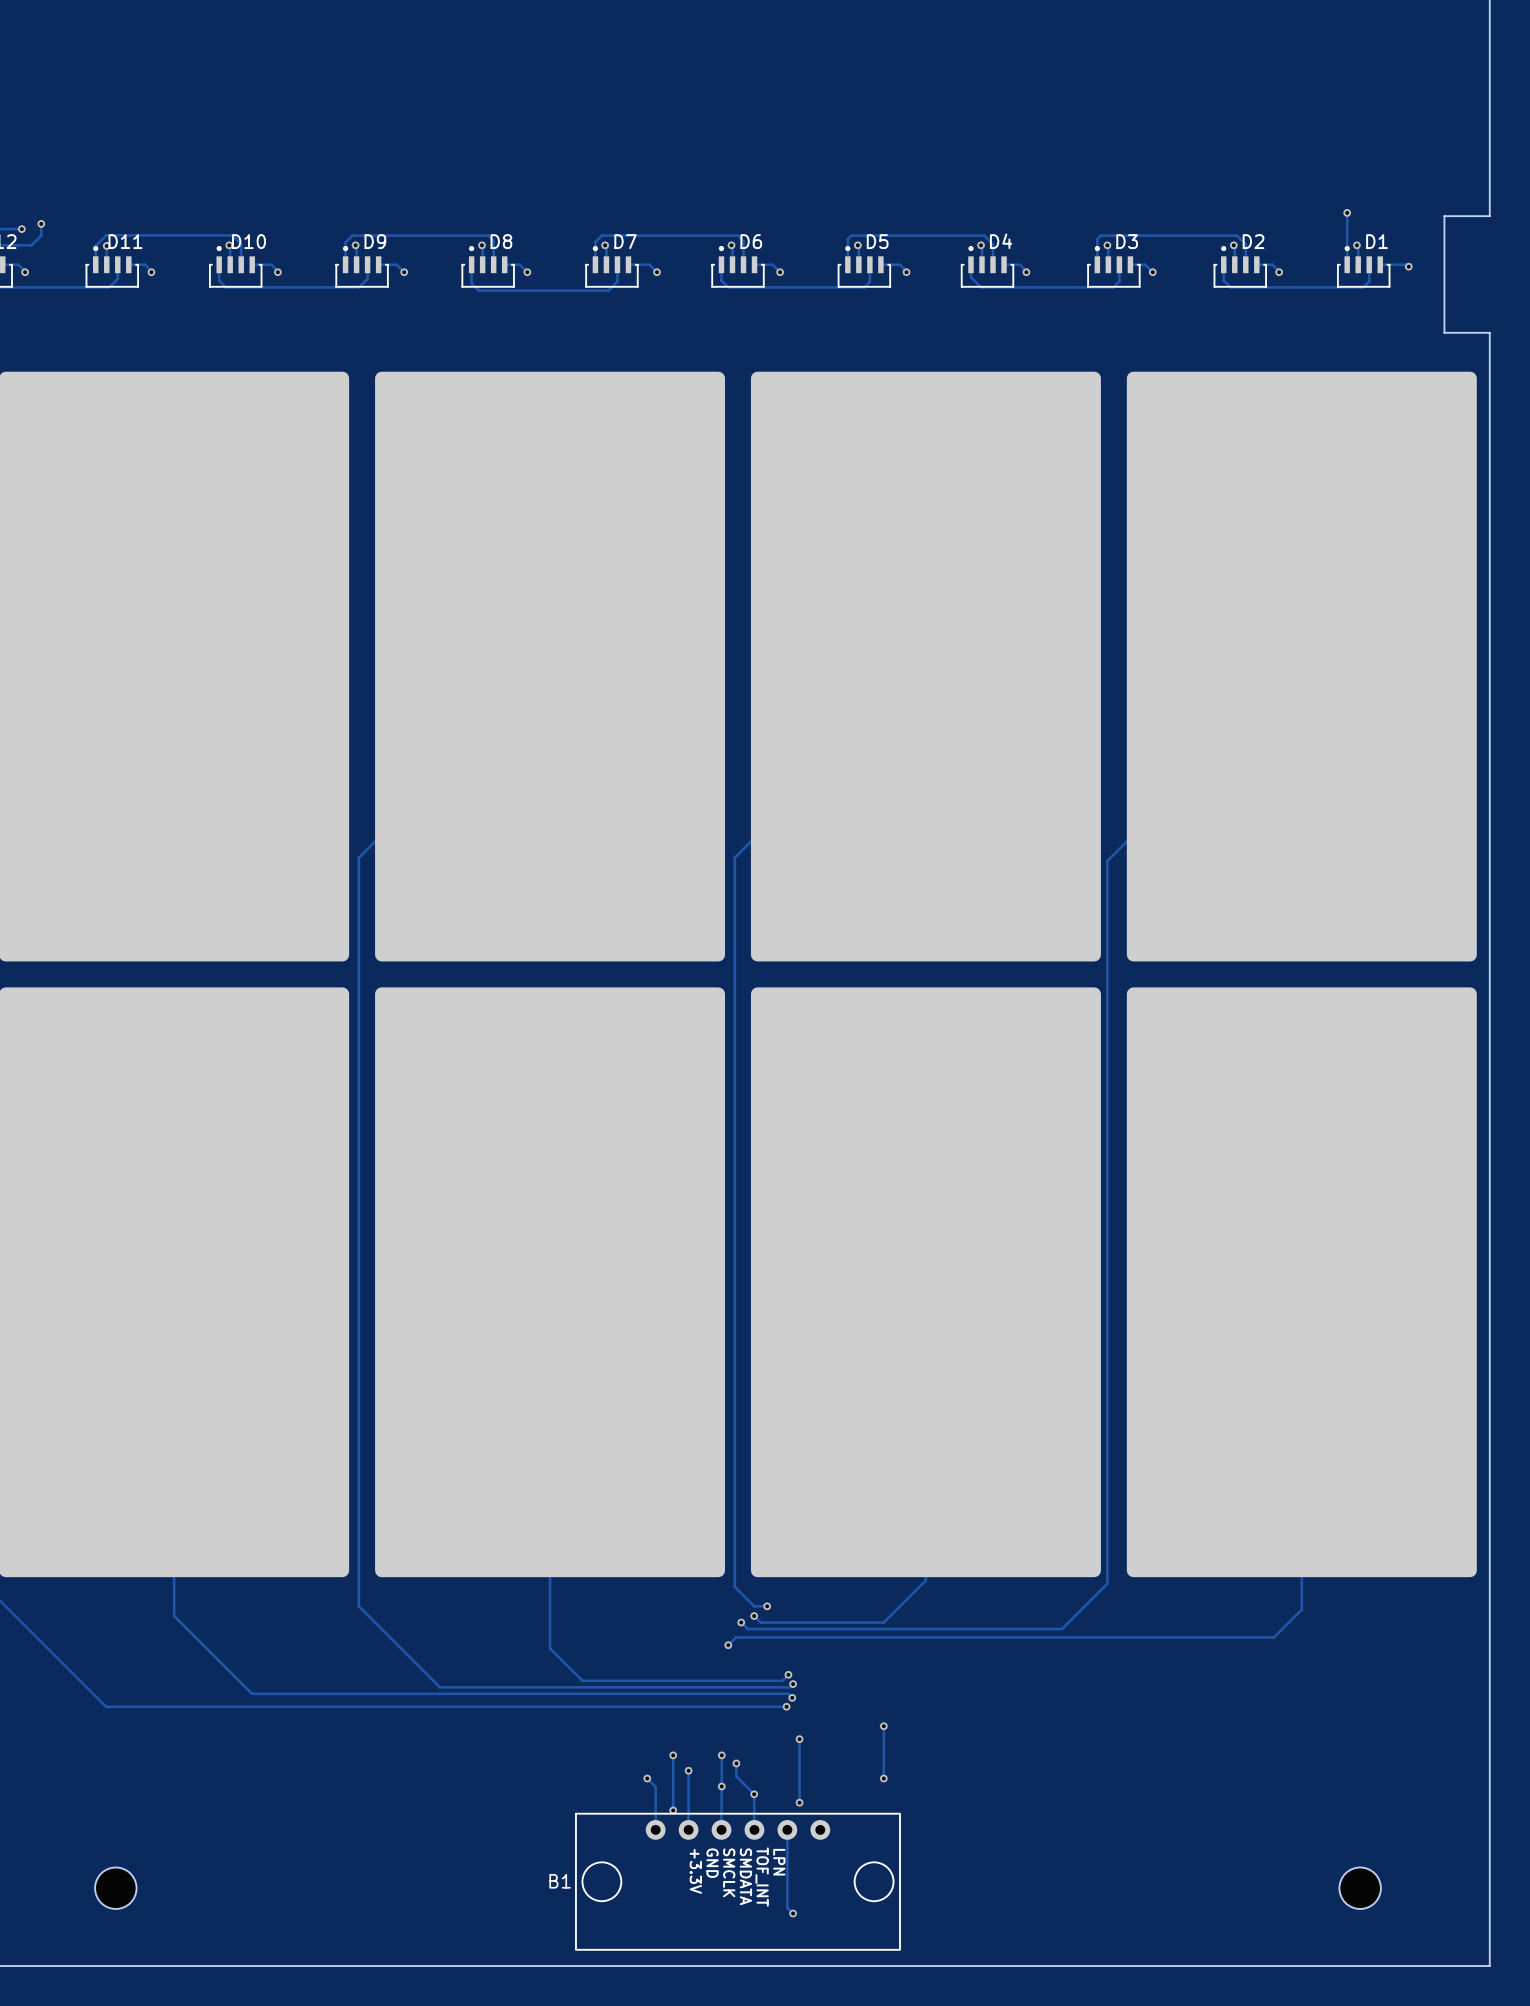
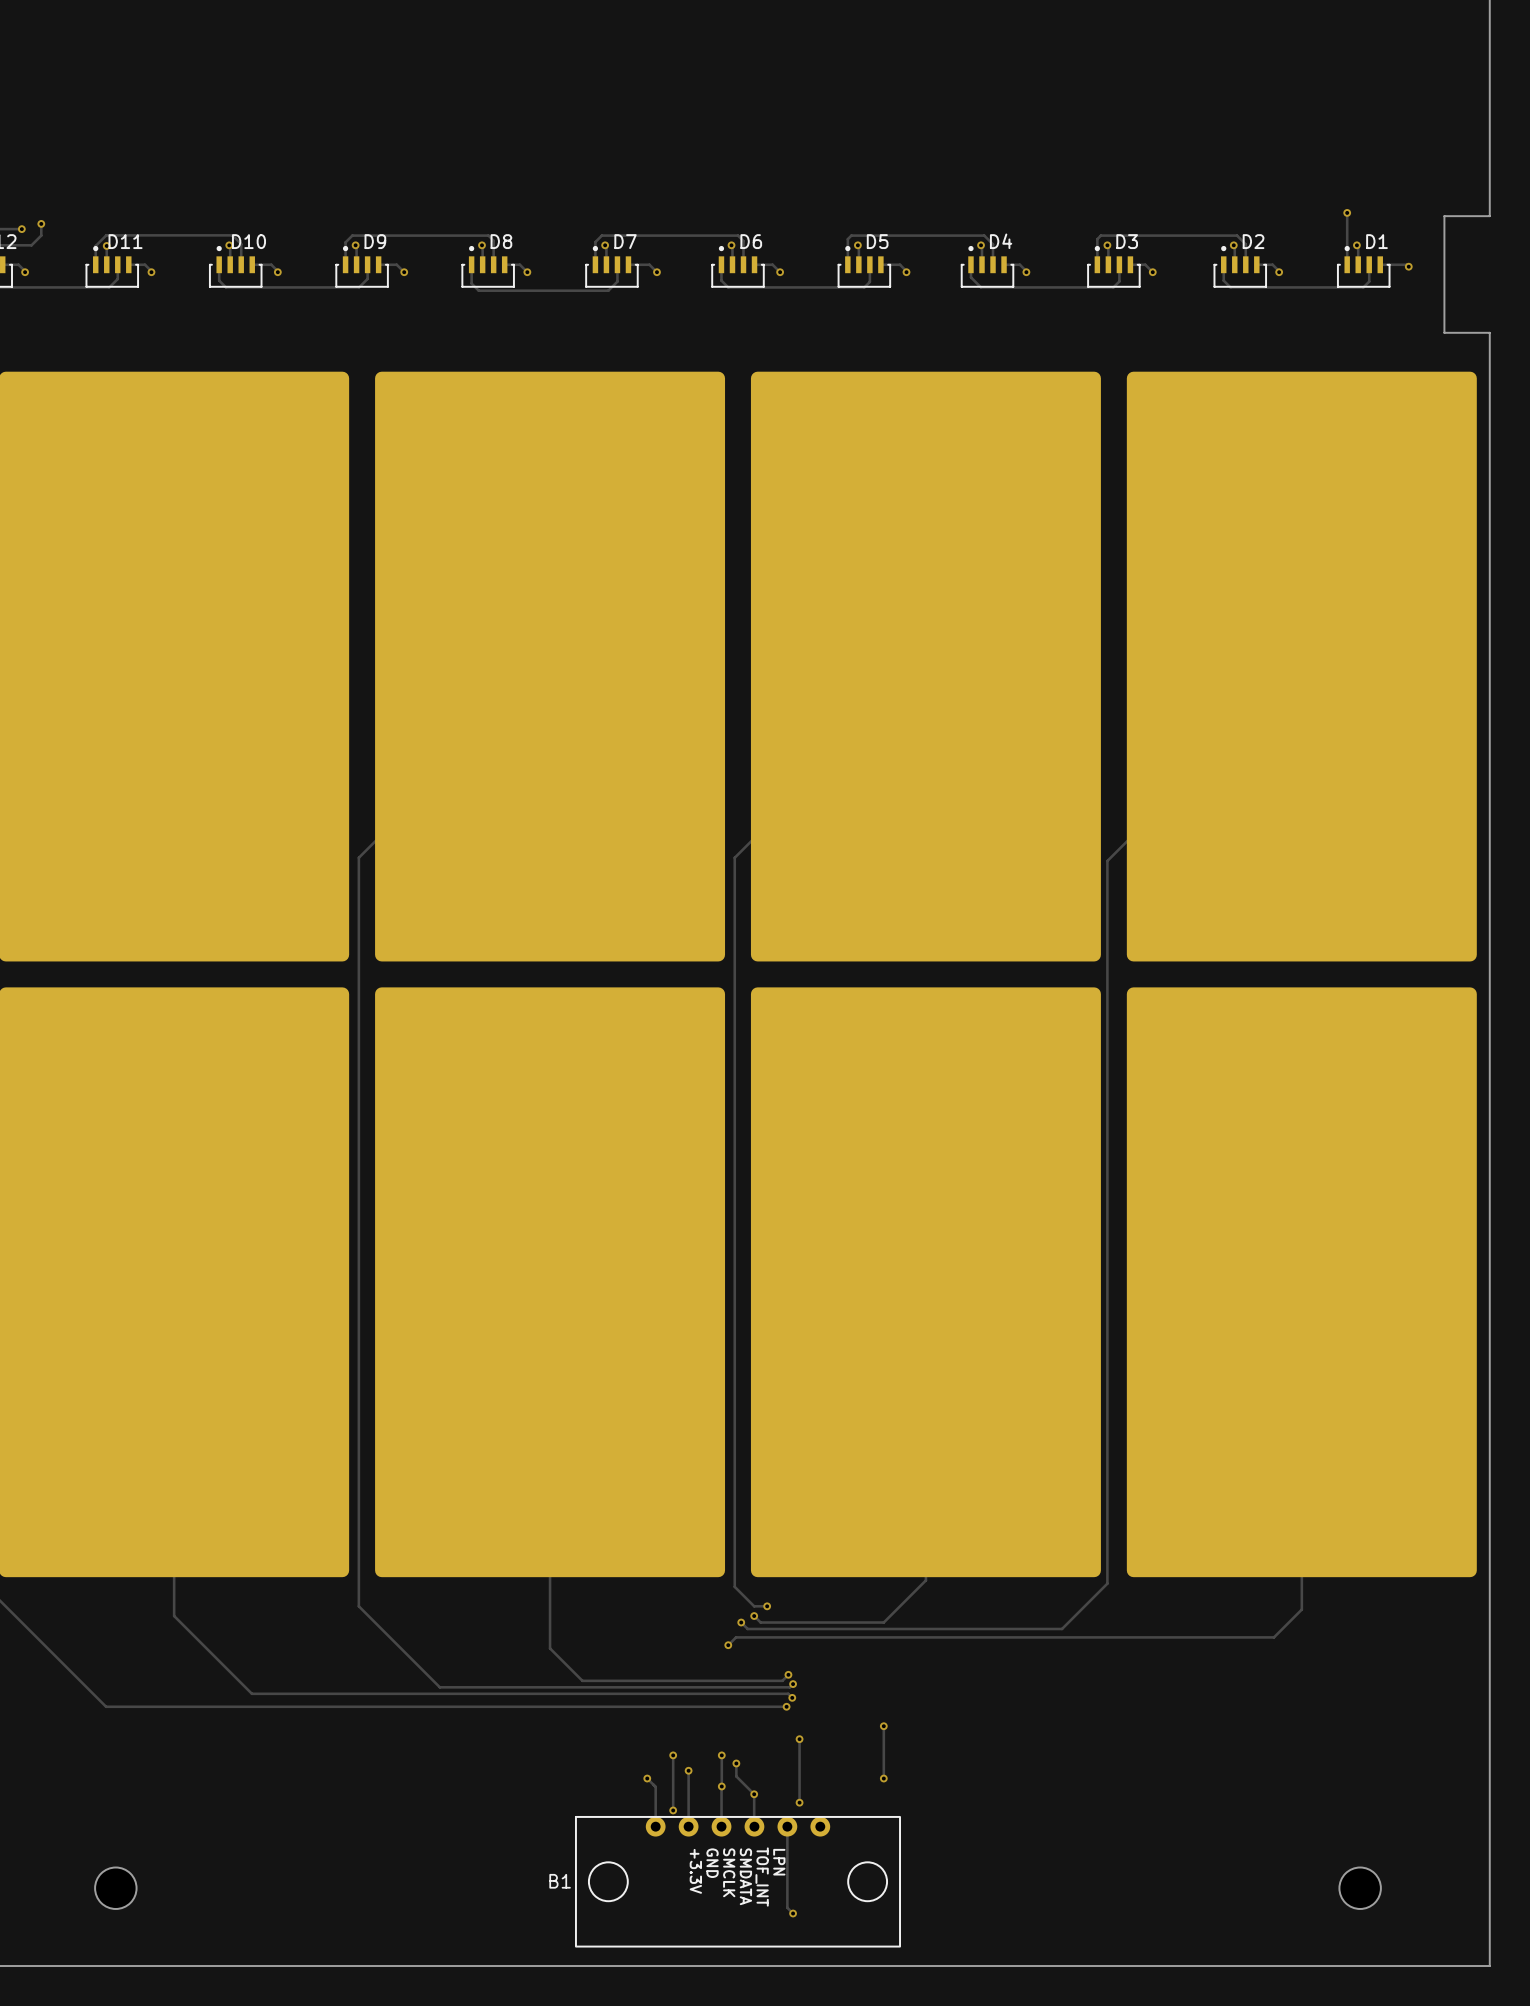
B1 footprint: [575, 1813, 901, 1951] -> [575, 1816, 901, 1947]

